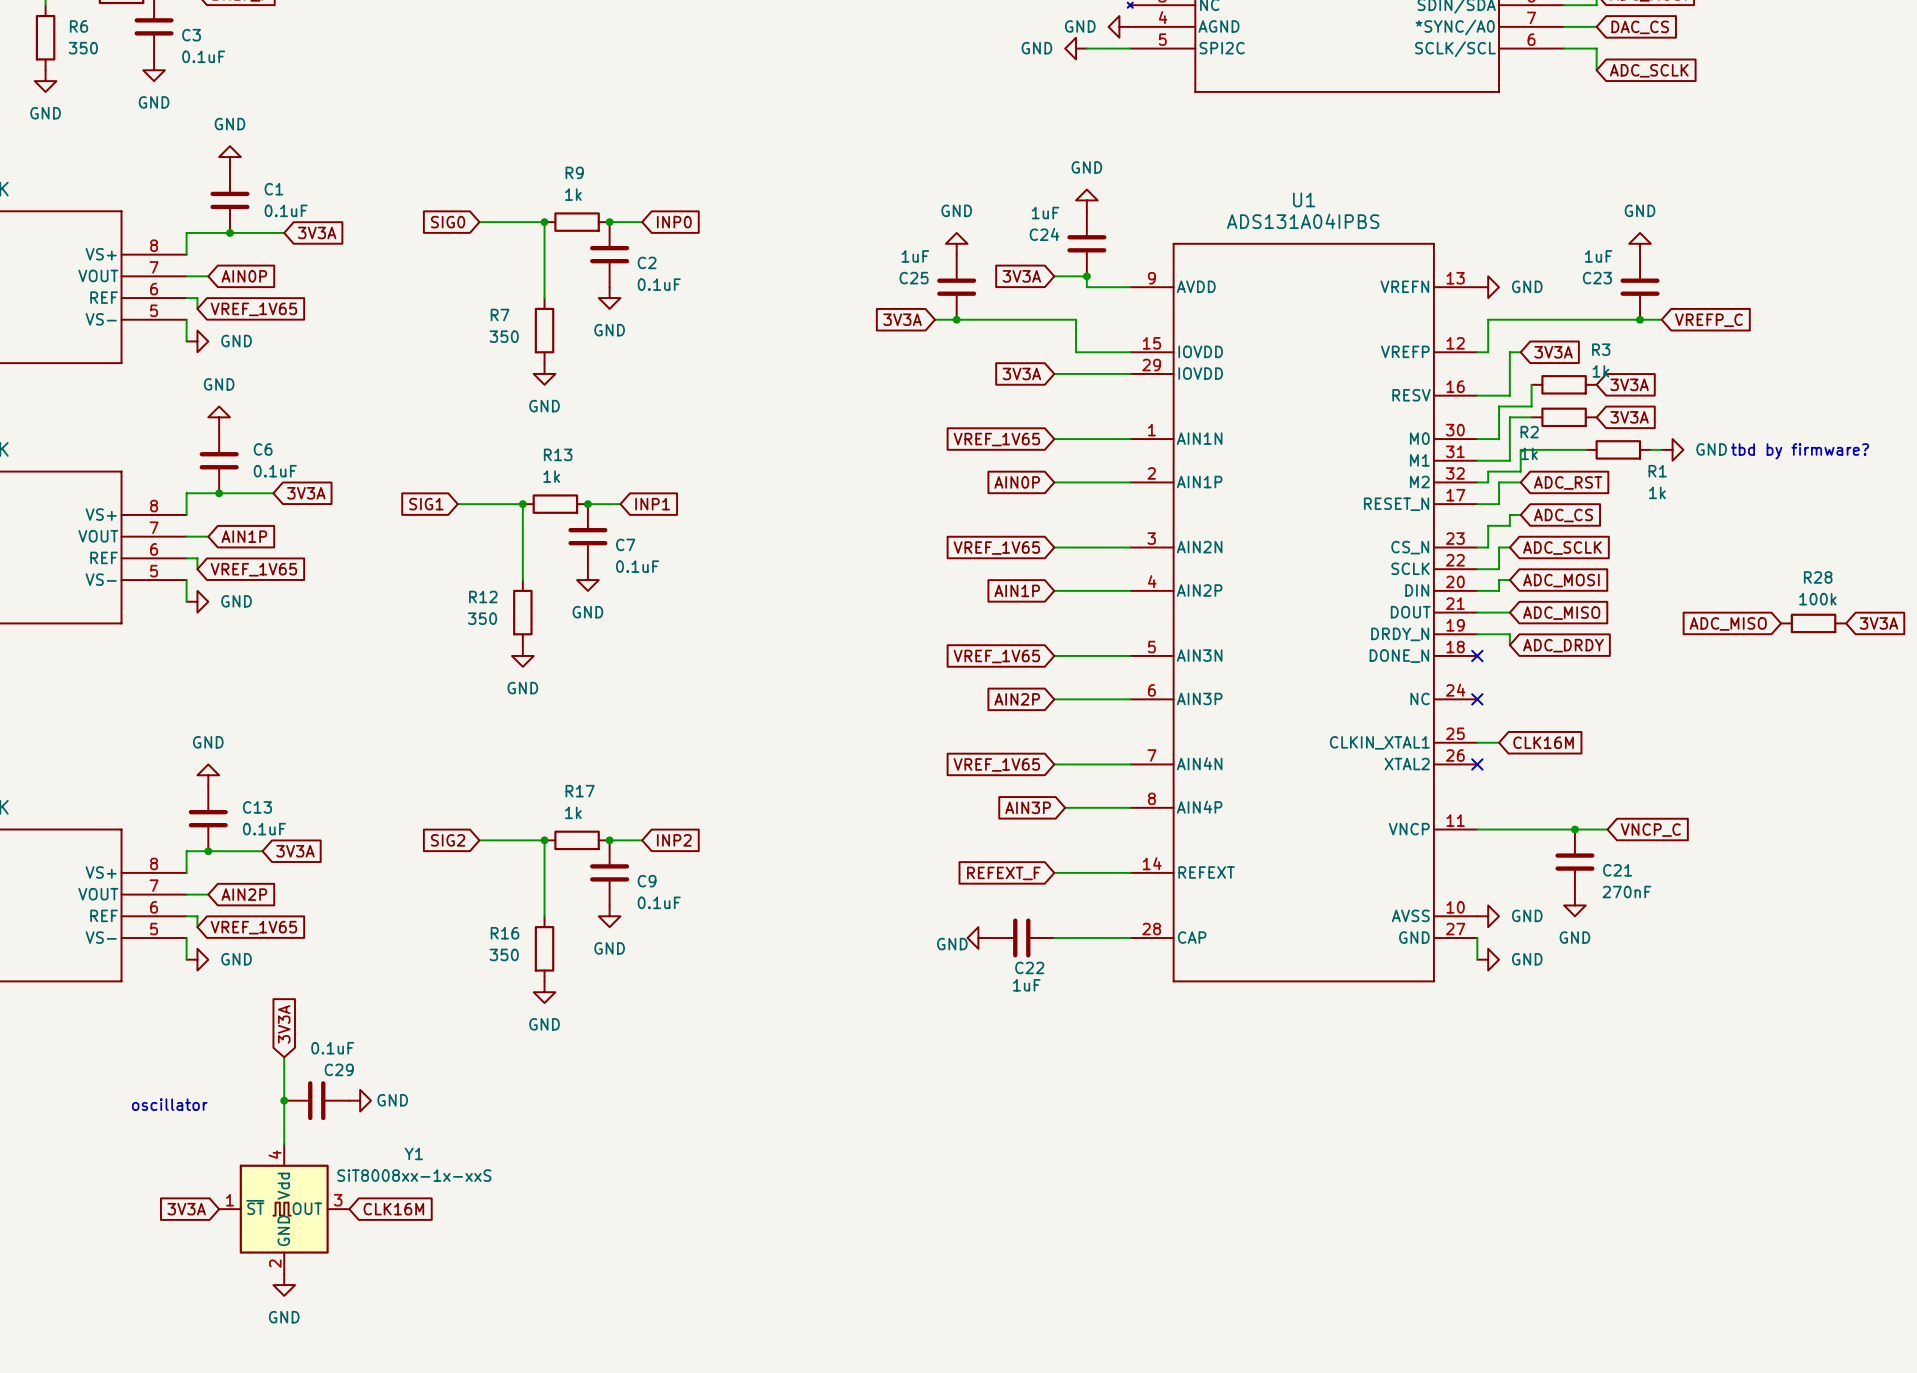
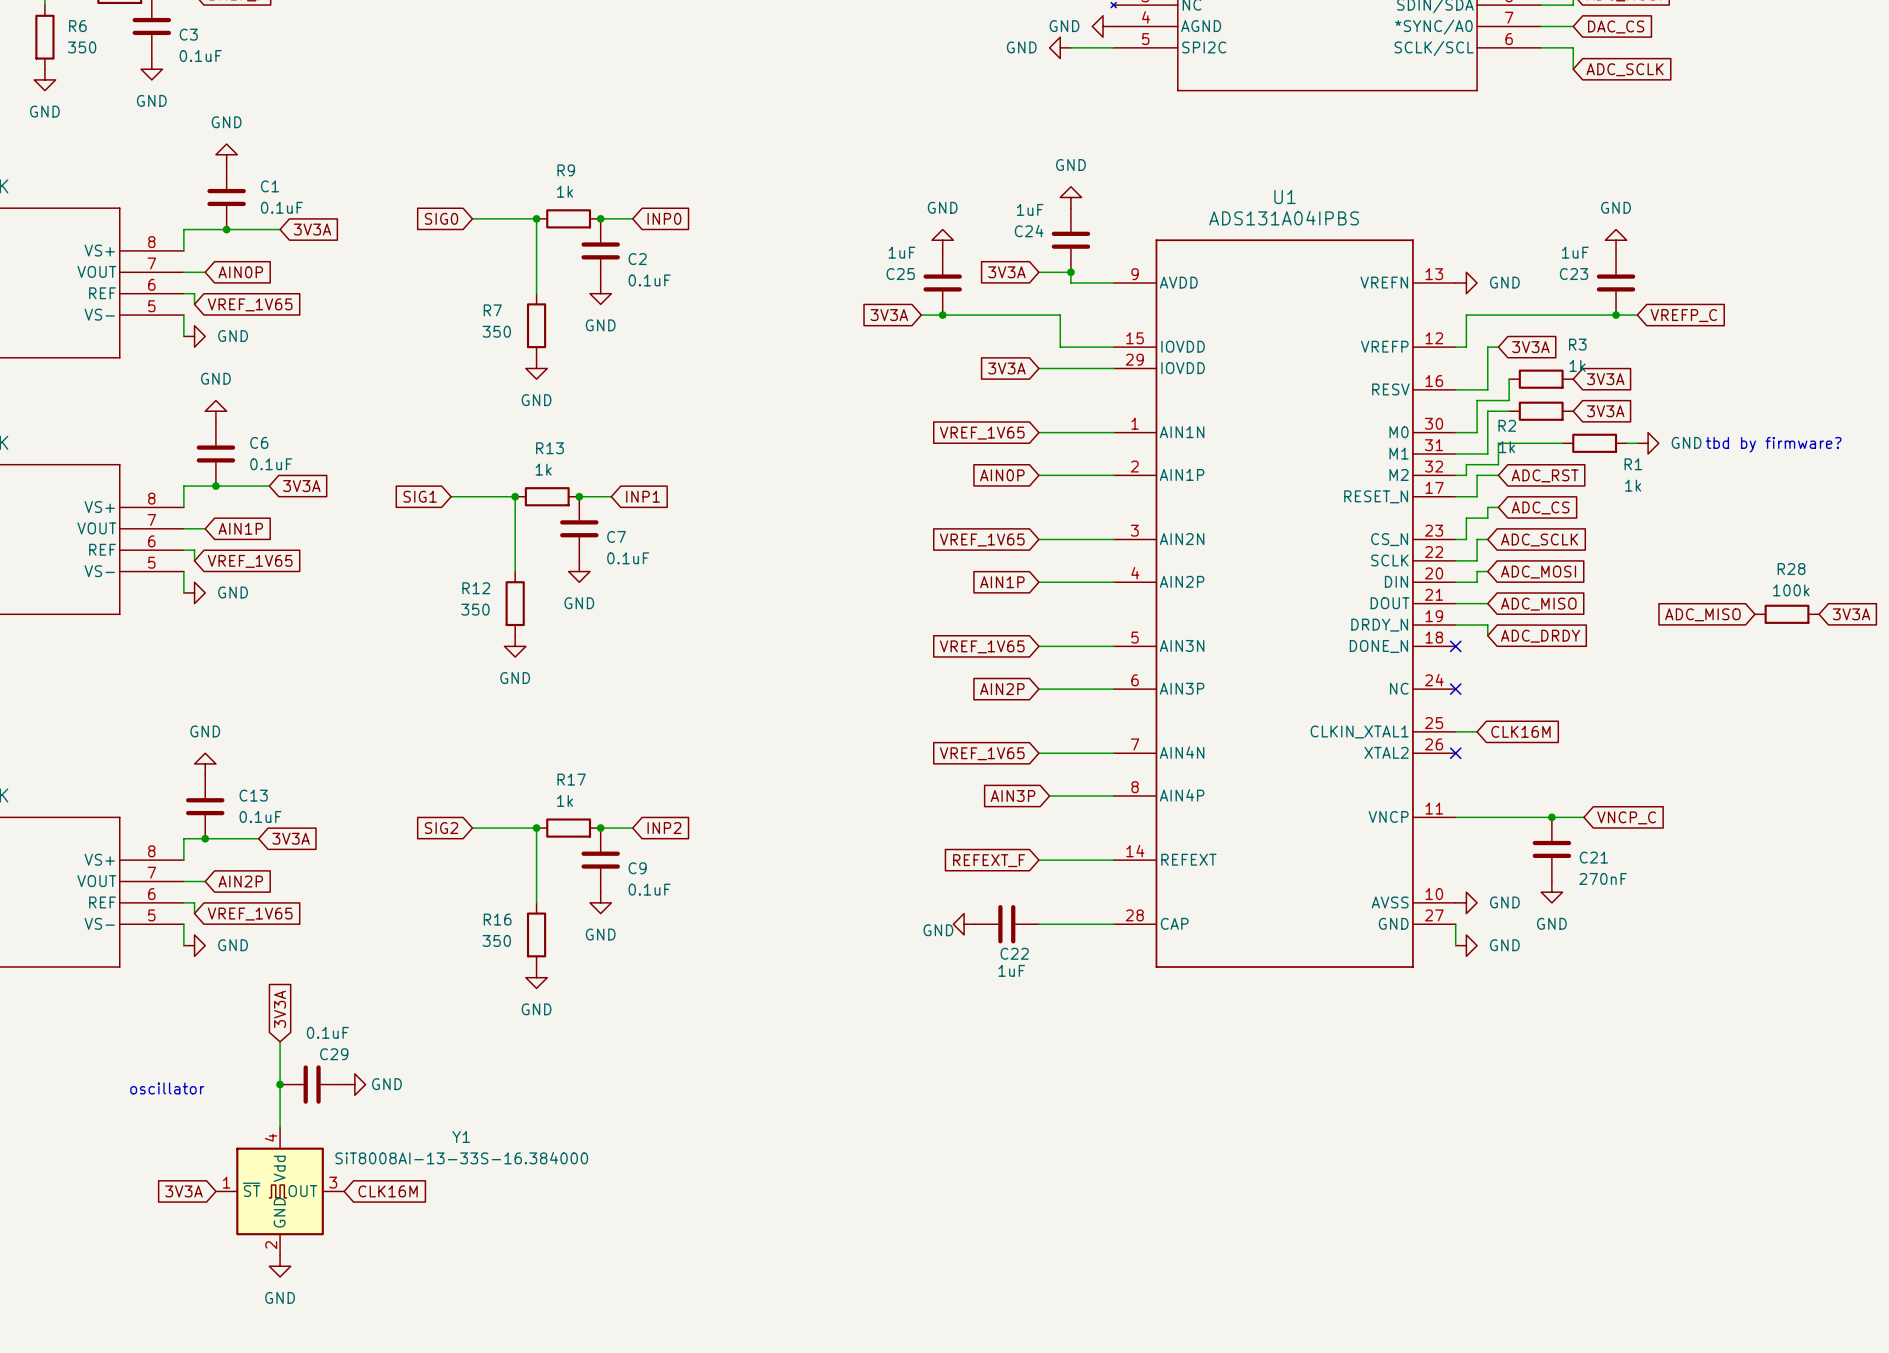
Y1 name position: Y1 (413, 1153) -> Y1 (461, 1137)
Y1 value: SiT8008xx-1x-xxS (414, 1175) -> SiT8008AI-13-33S-16.384000 (461, 1158)

